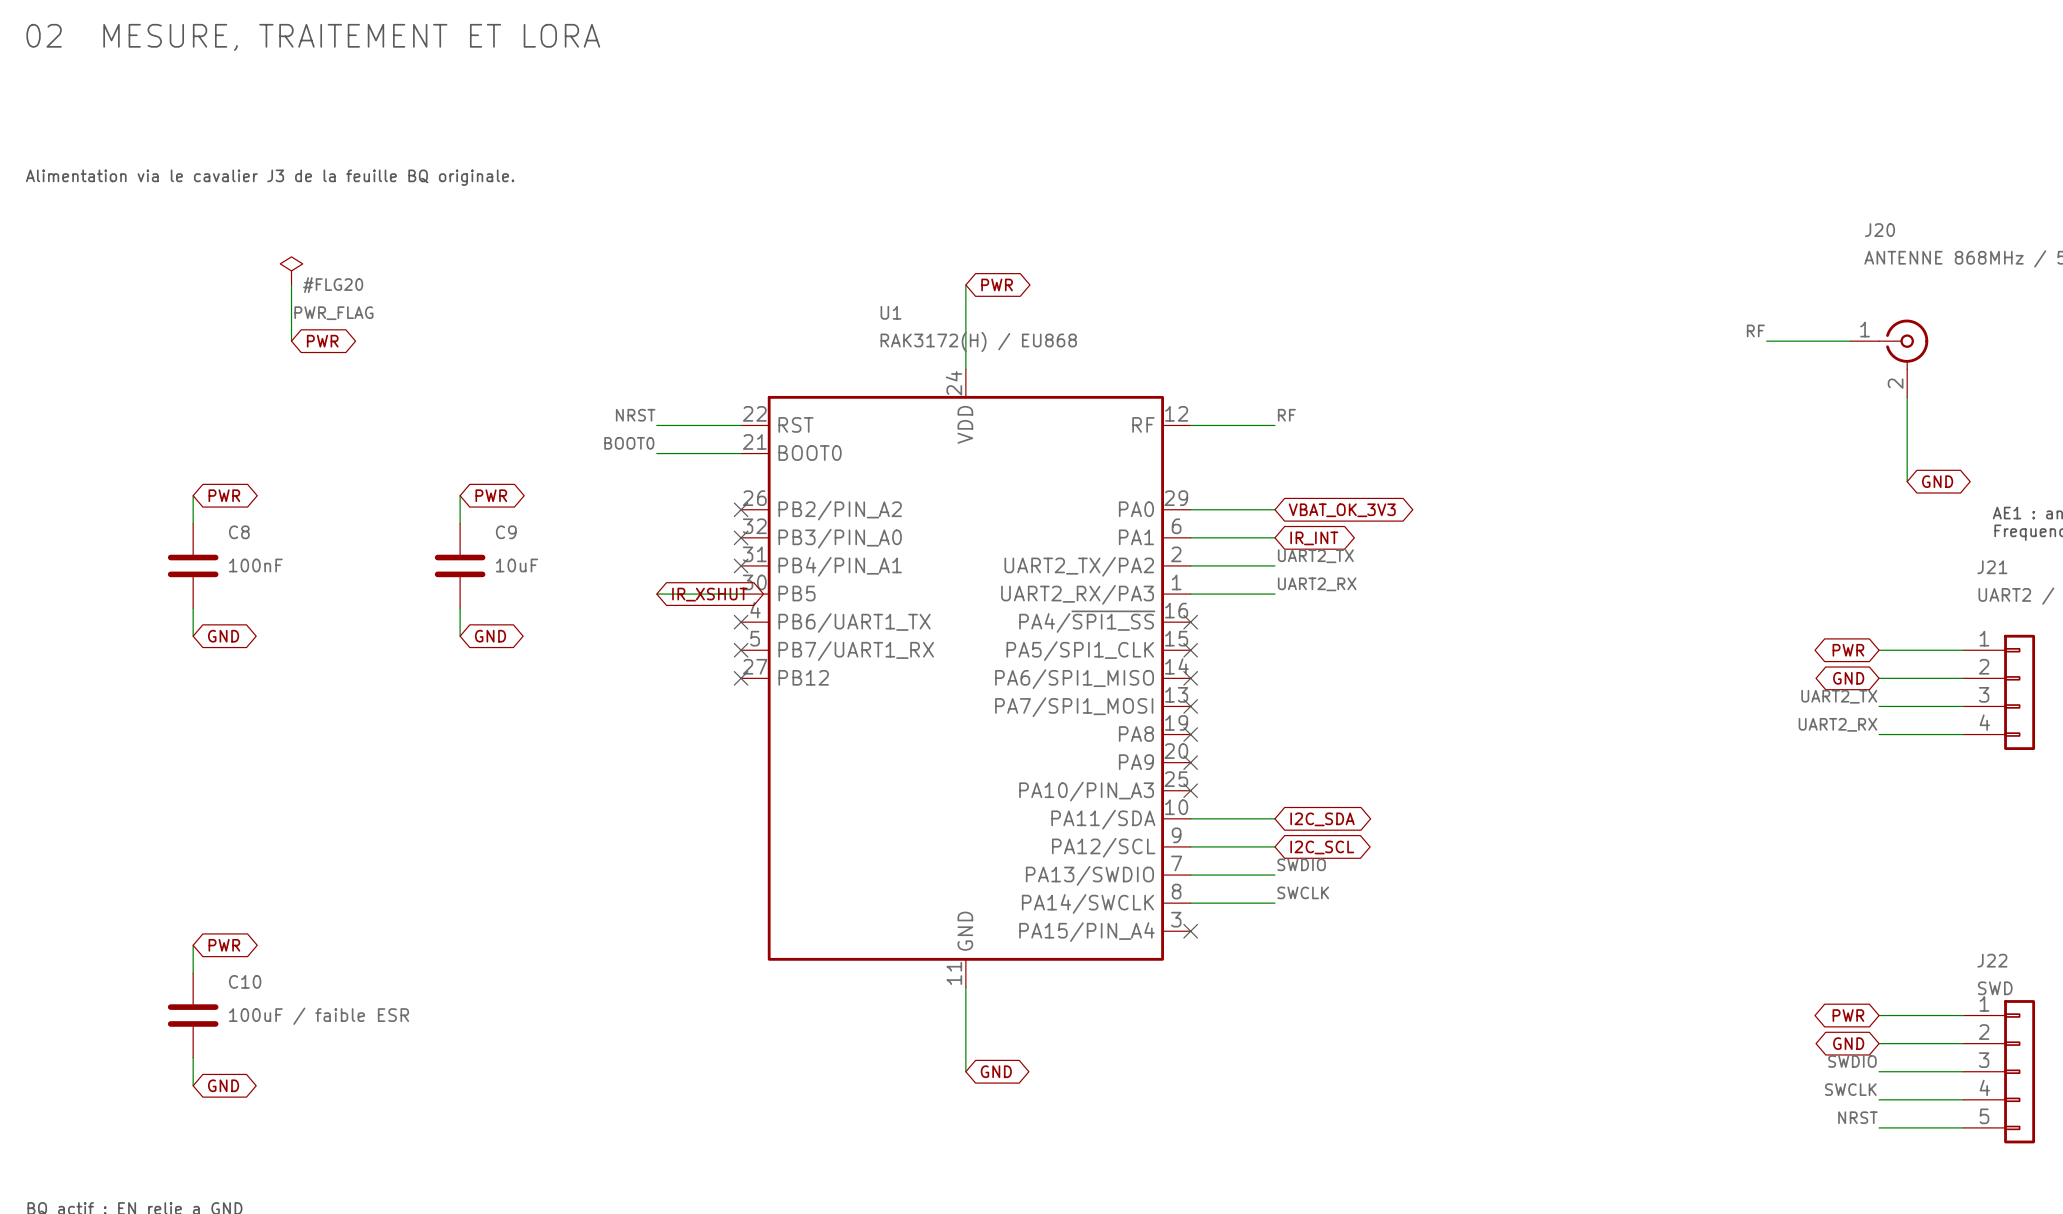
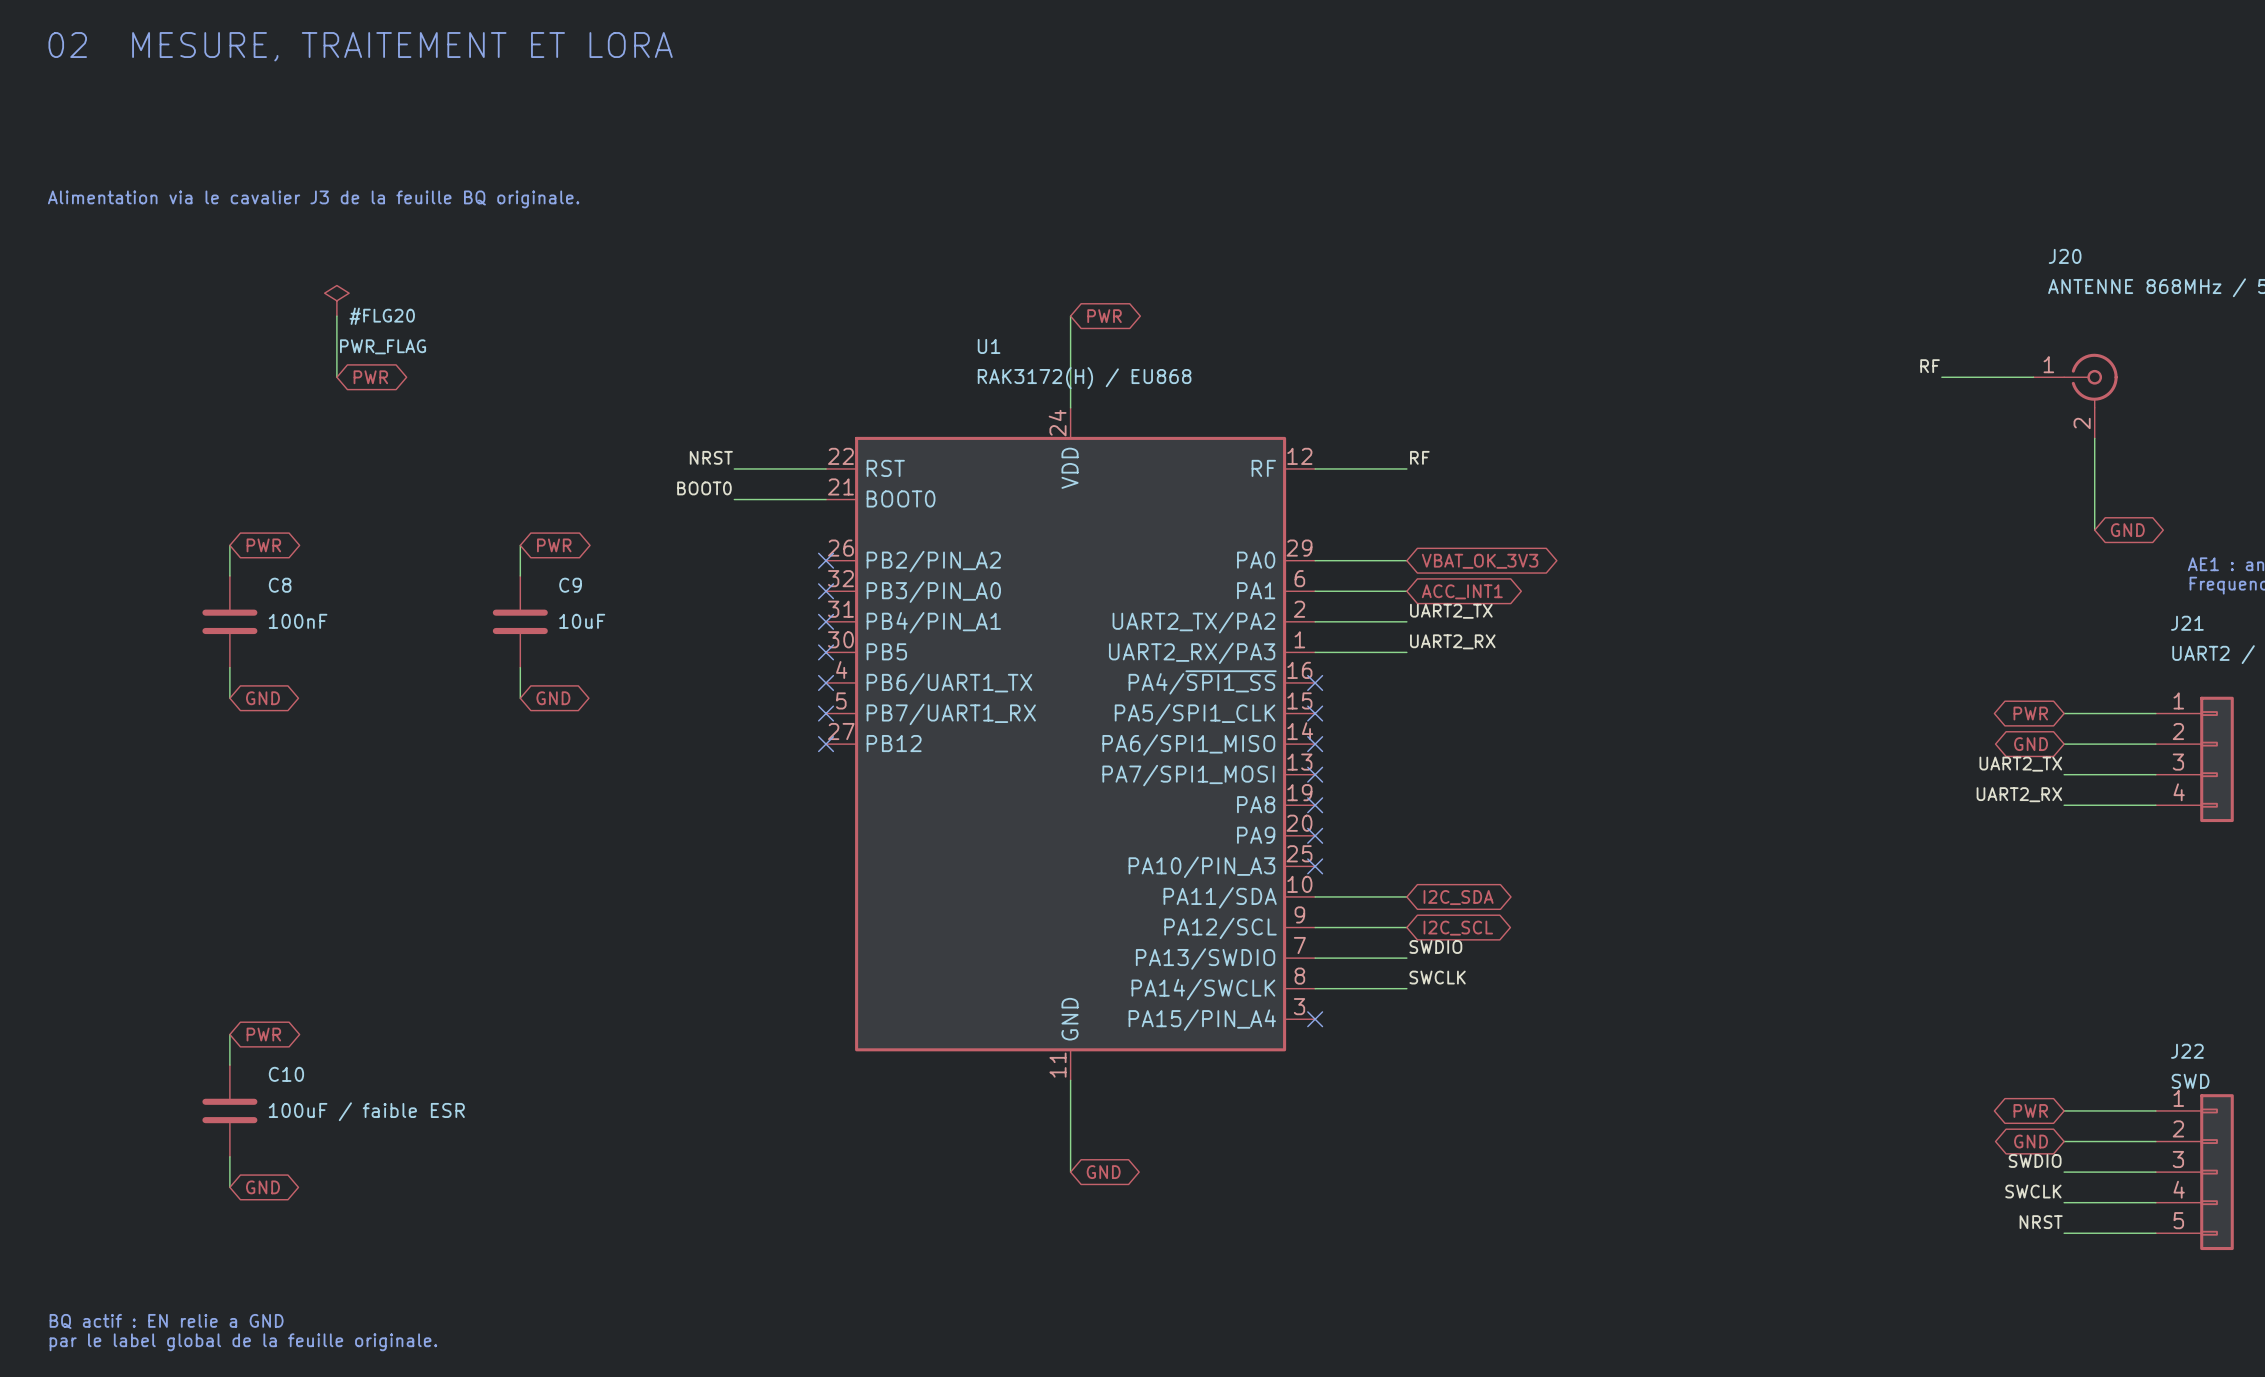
global label: IR_INT (1314, 538) -> ACC_INT1 (1462, 591)
wire: (656, 594) (741, 594) -> none
global label: IR_XSHUT (709, 594) -> none
no-connect mark: none -> (826, 652)

